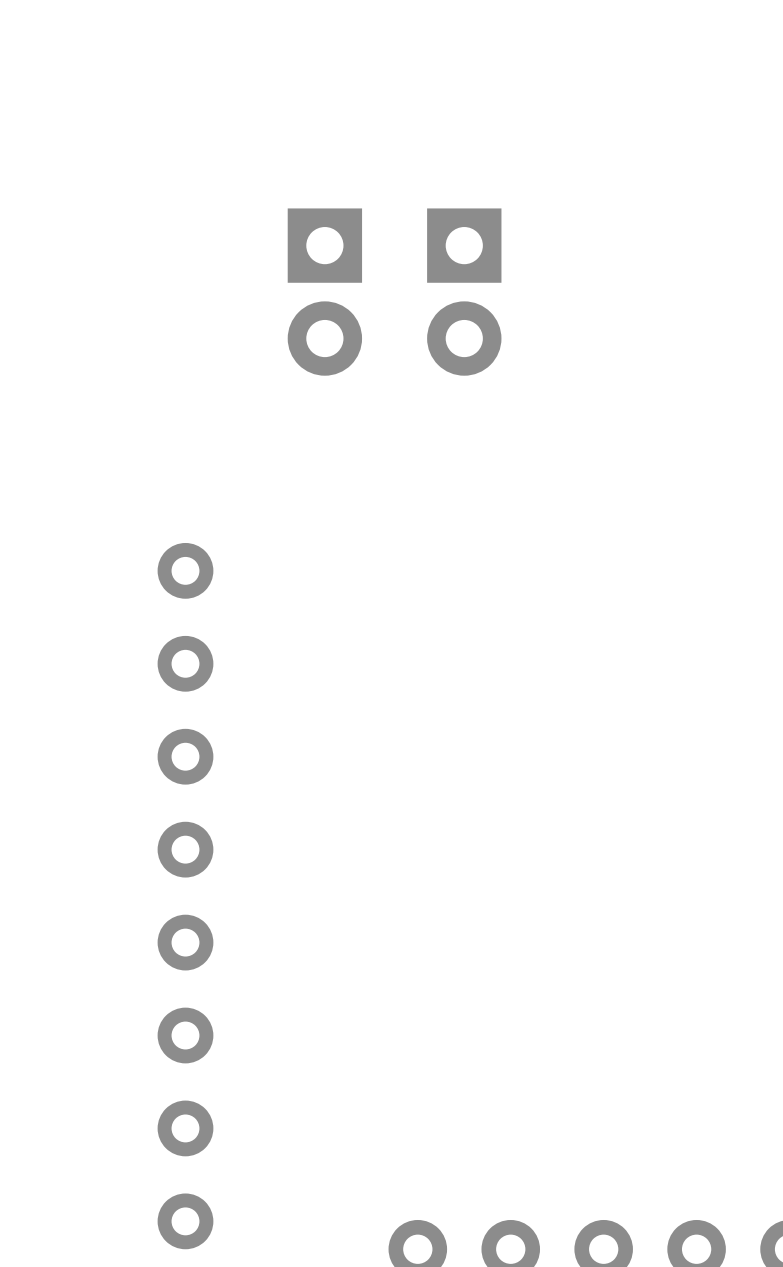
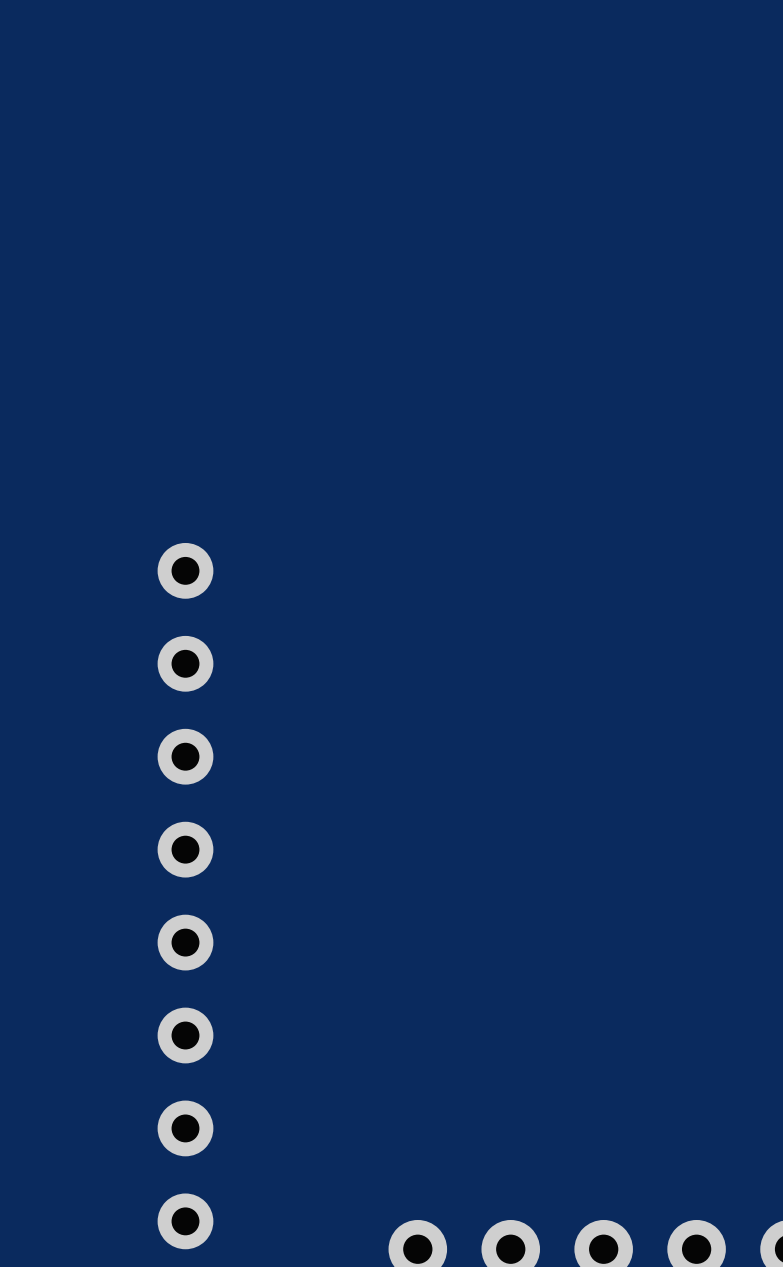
part: (324, 292) -> none
part: (464, 292) -> none

